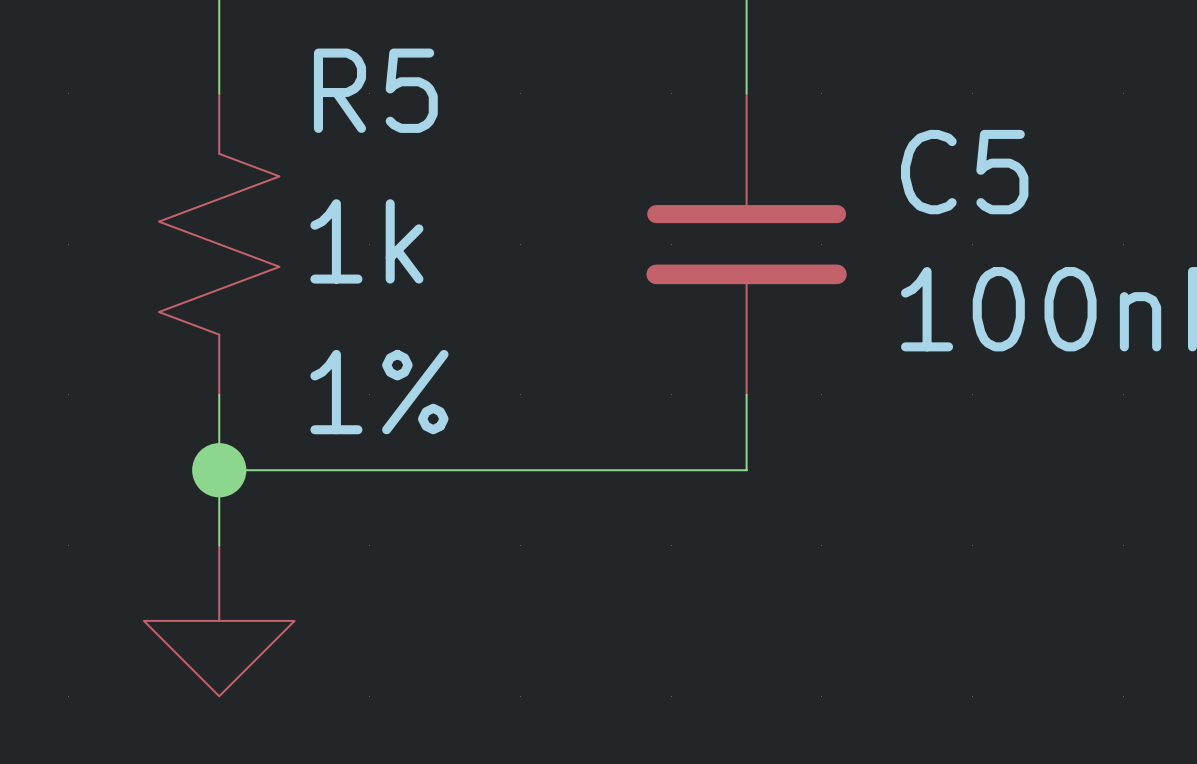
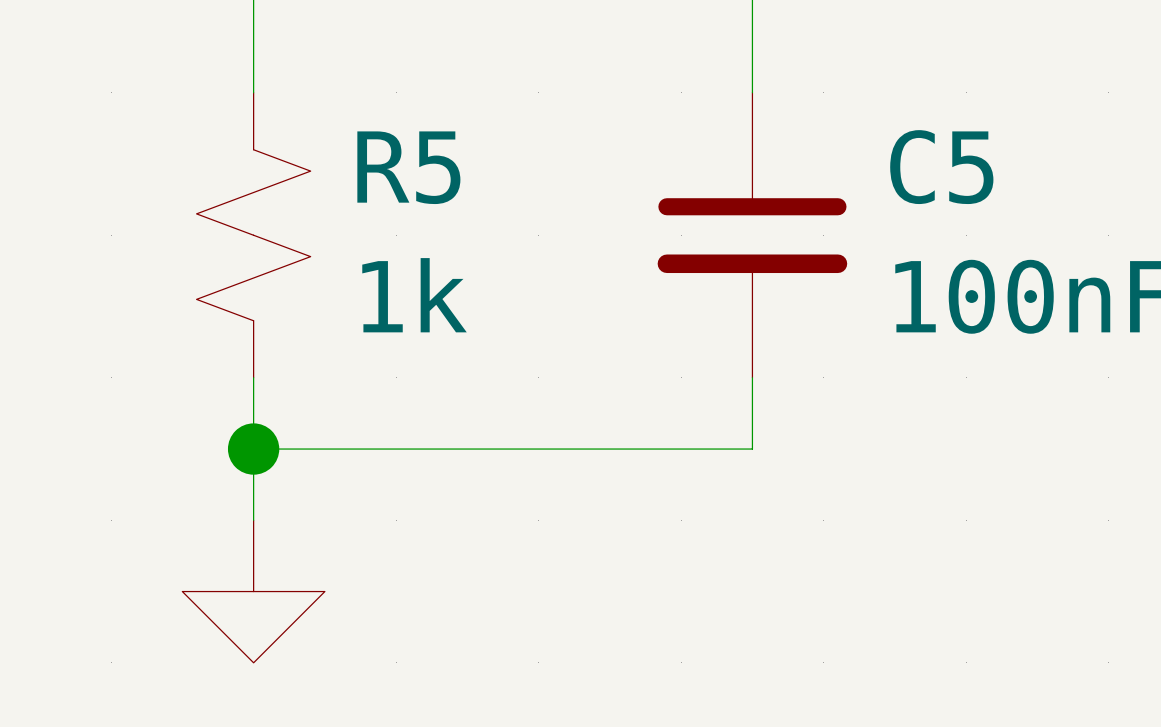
R5 name position: R5 (375, 90) -> R5 (408, 167)
R5 value position: 1k (366, 241) -> 1k (414, 295)
R5 text: 1% (379, 392) -> none

